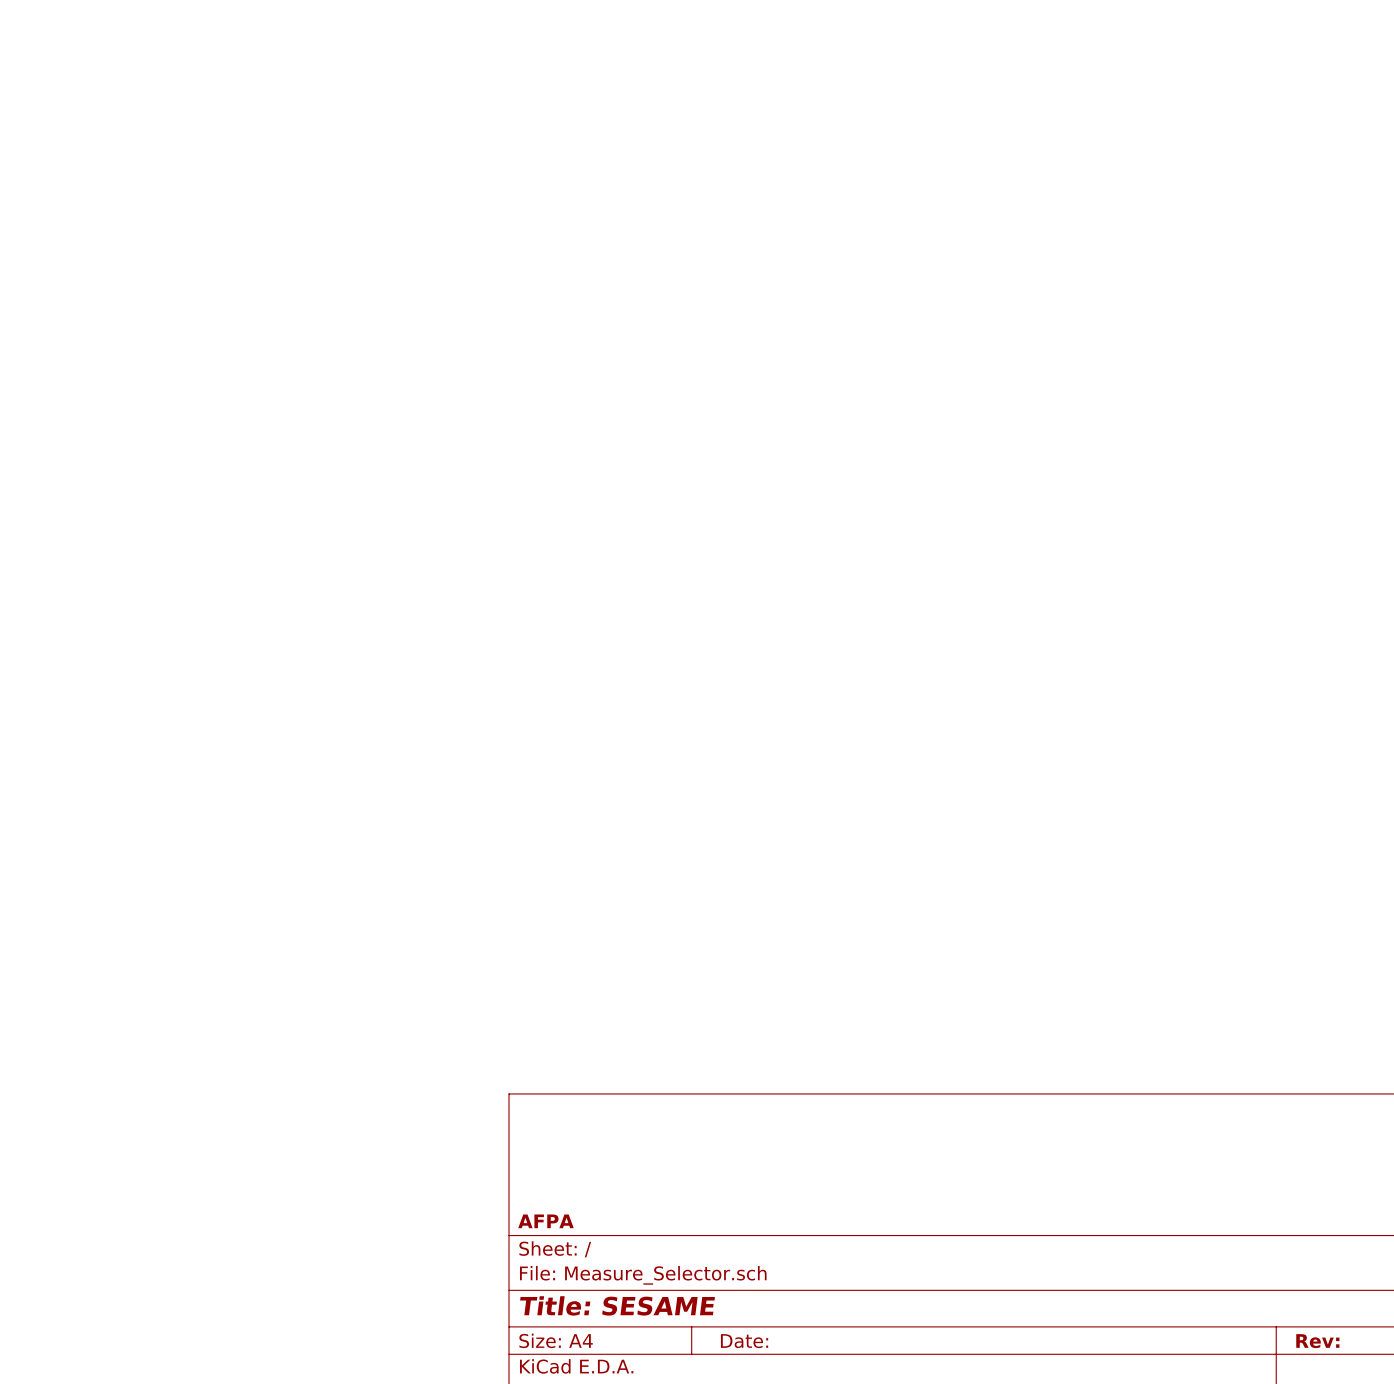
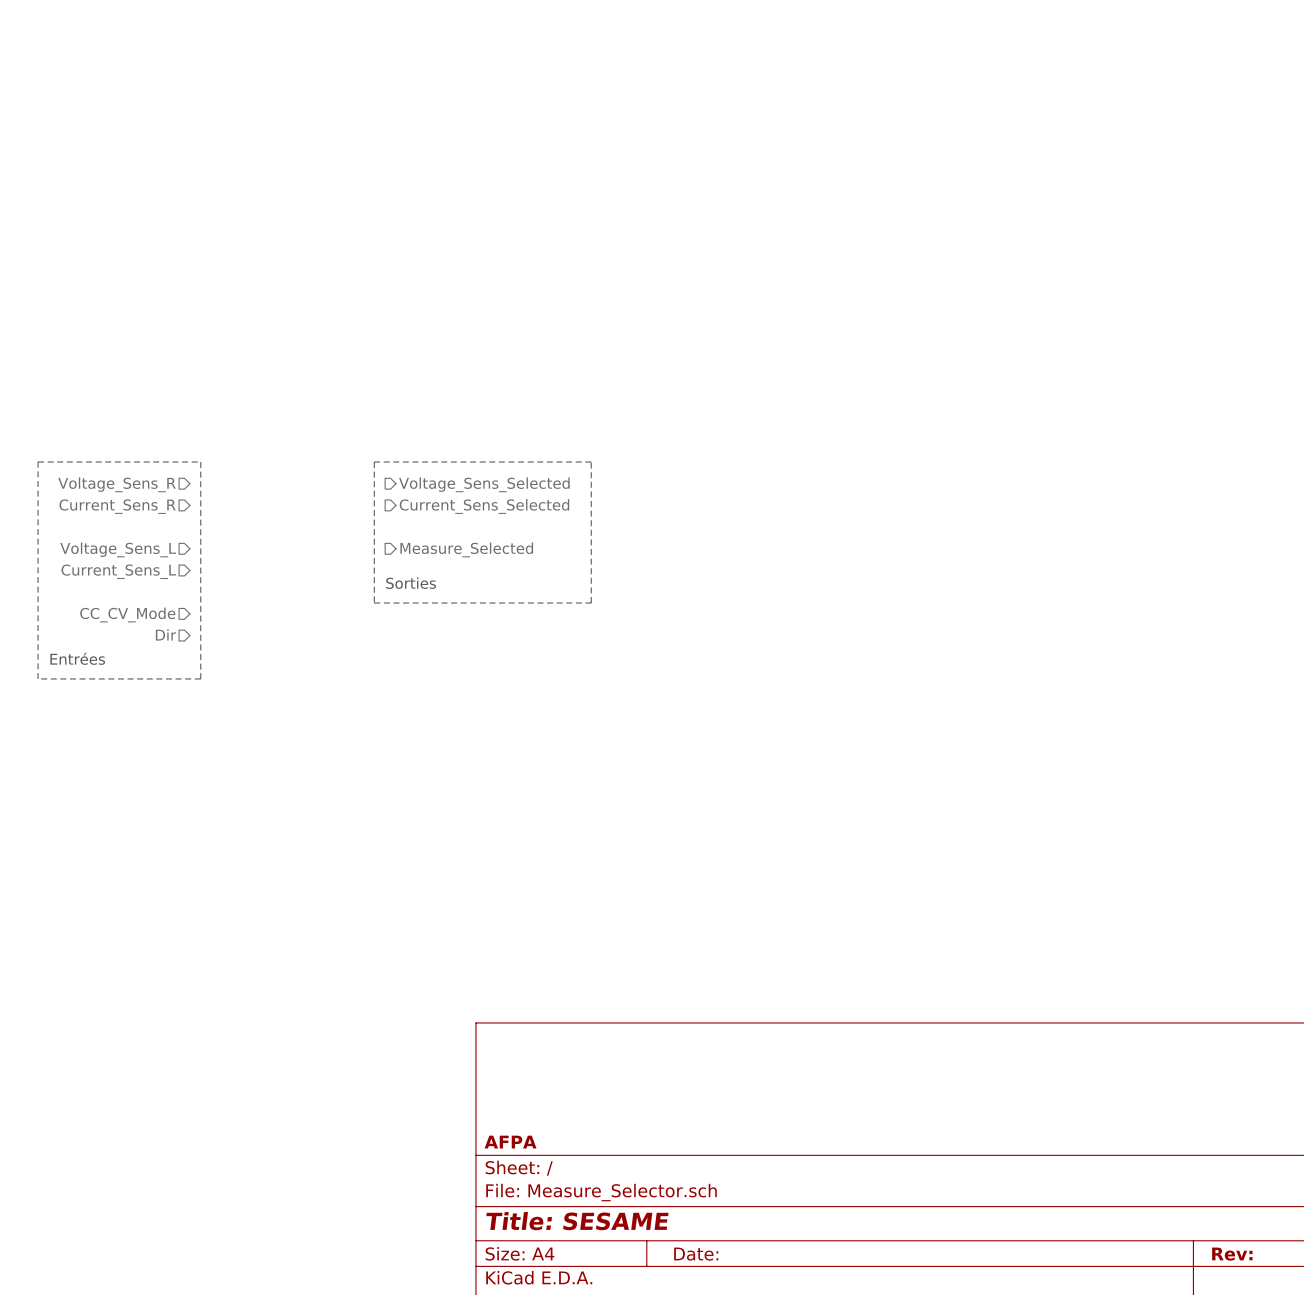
line: none -> (38, 462) (200, 462) (200, 678) (38, 678) (38, 462)
line: none -> (374, 462) (374, 603) (591, 603) (591, 462) (374, 462)
hierarchical label: none -> Voltage_Sens_R (116, 484)
hierarchical label: none -> Voltage_Sens_Selected (484, 484)
hierarchical label: none -> Current_Sens_R (117, 506)
hierarchical label: none -> Current_Sens_Selected (484, 506)
hierarchical label: none -> Voltage_Sens_L (118, 549)
hierarchical label: none -> Measure_Selected (466, 549)
hierarchical label: none -> Current_Sens_L (118, 571)
text: none -> Sorties (411, 583)
hierarchical label: none -> CC_CV_Mode (127, 614)
hierarchical label: none -> Dir (166, 634)
text: none -> Entrées (77, 658)

